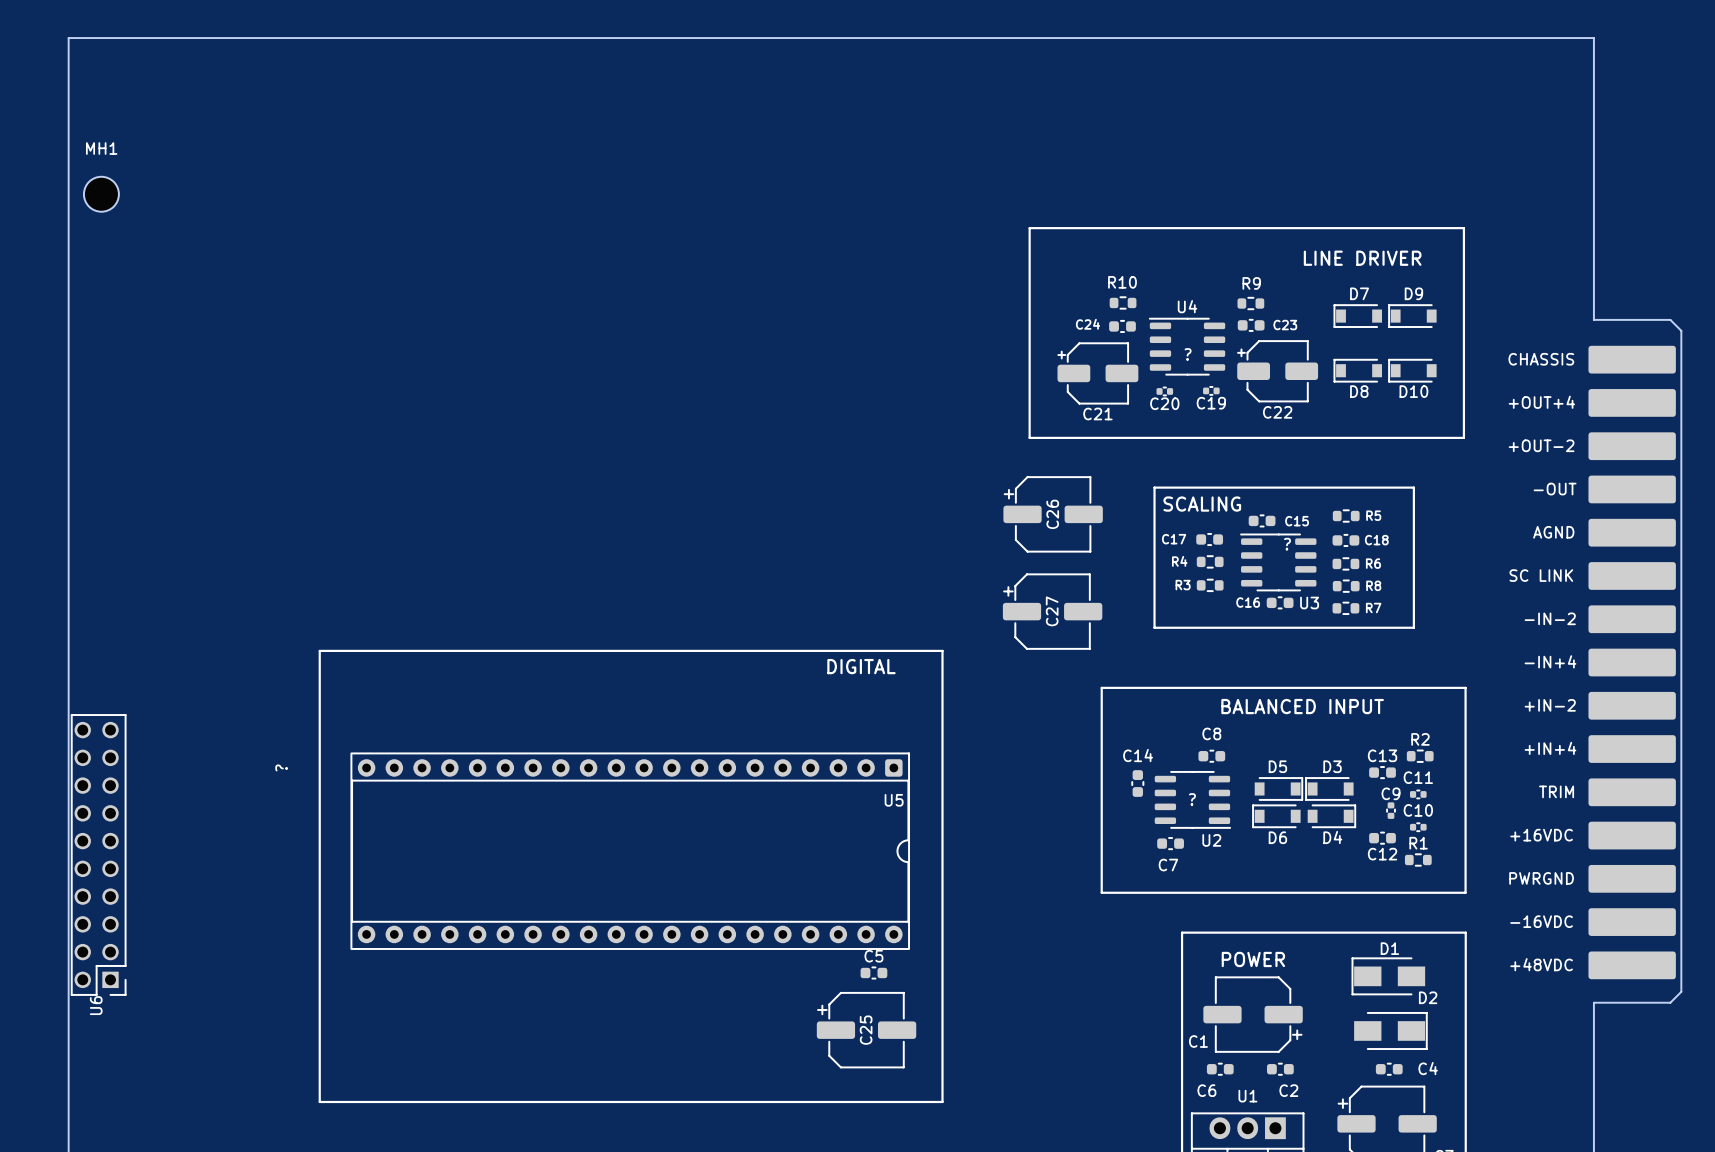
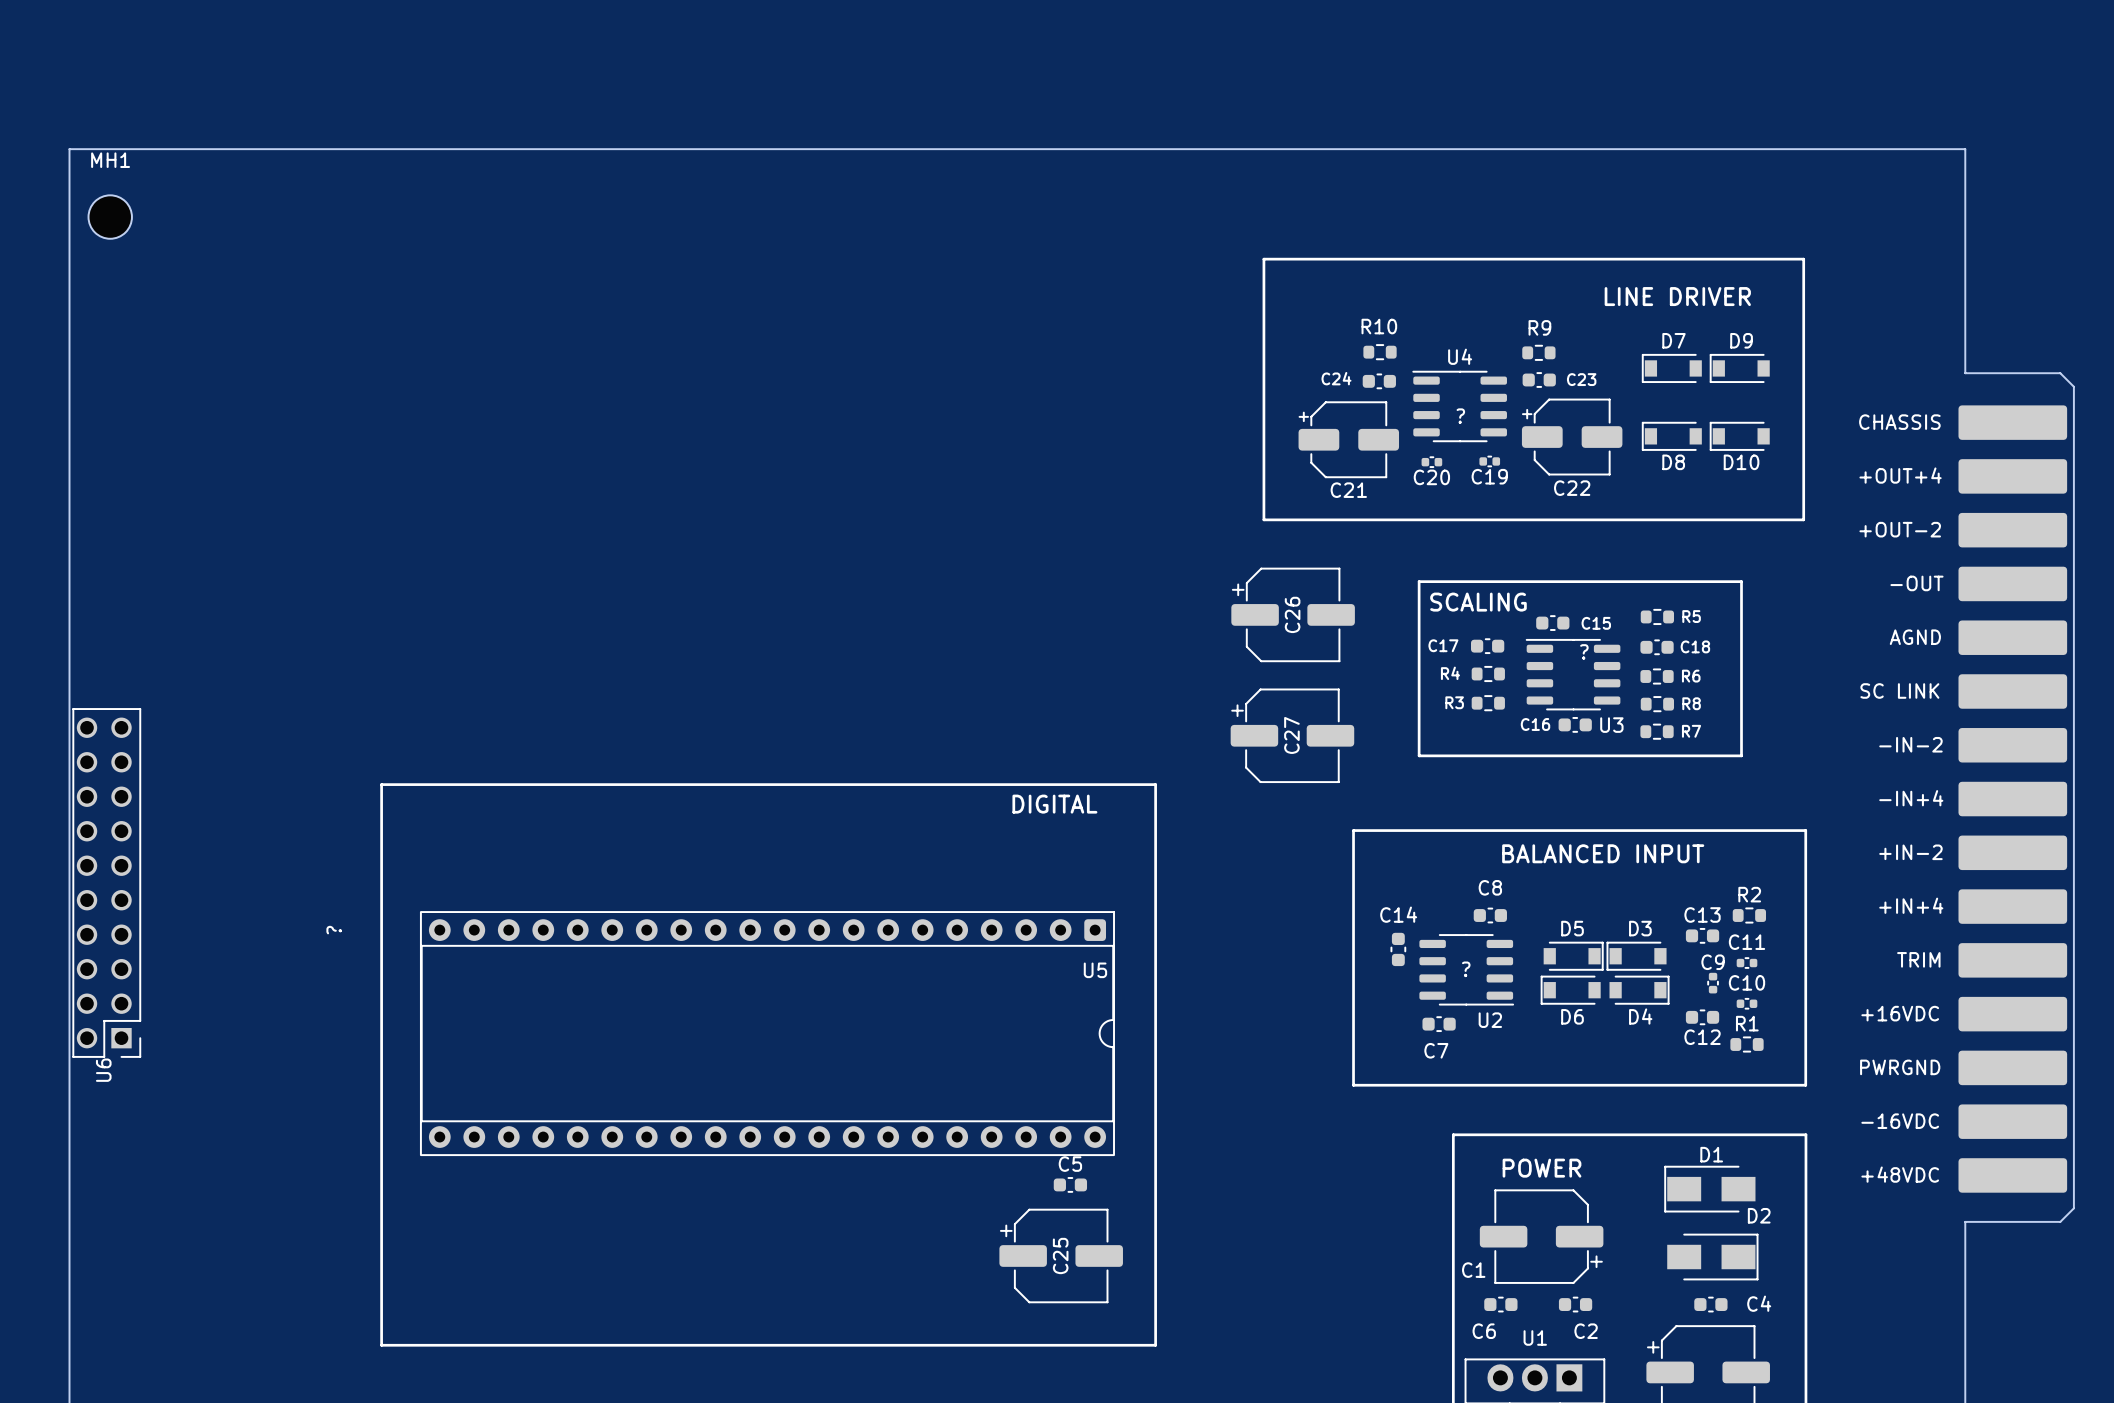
board edge: (68, 139) (68, 38) (1593, 38) (1593, 139) -> (69, 149) (1965, 149)
U6 position: (98, 854) -> (106, 882)

